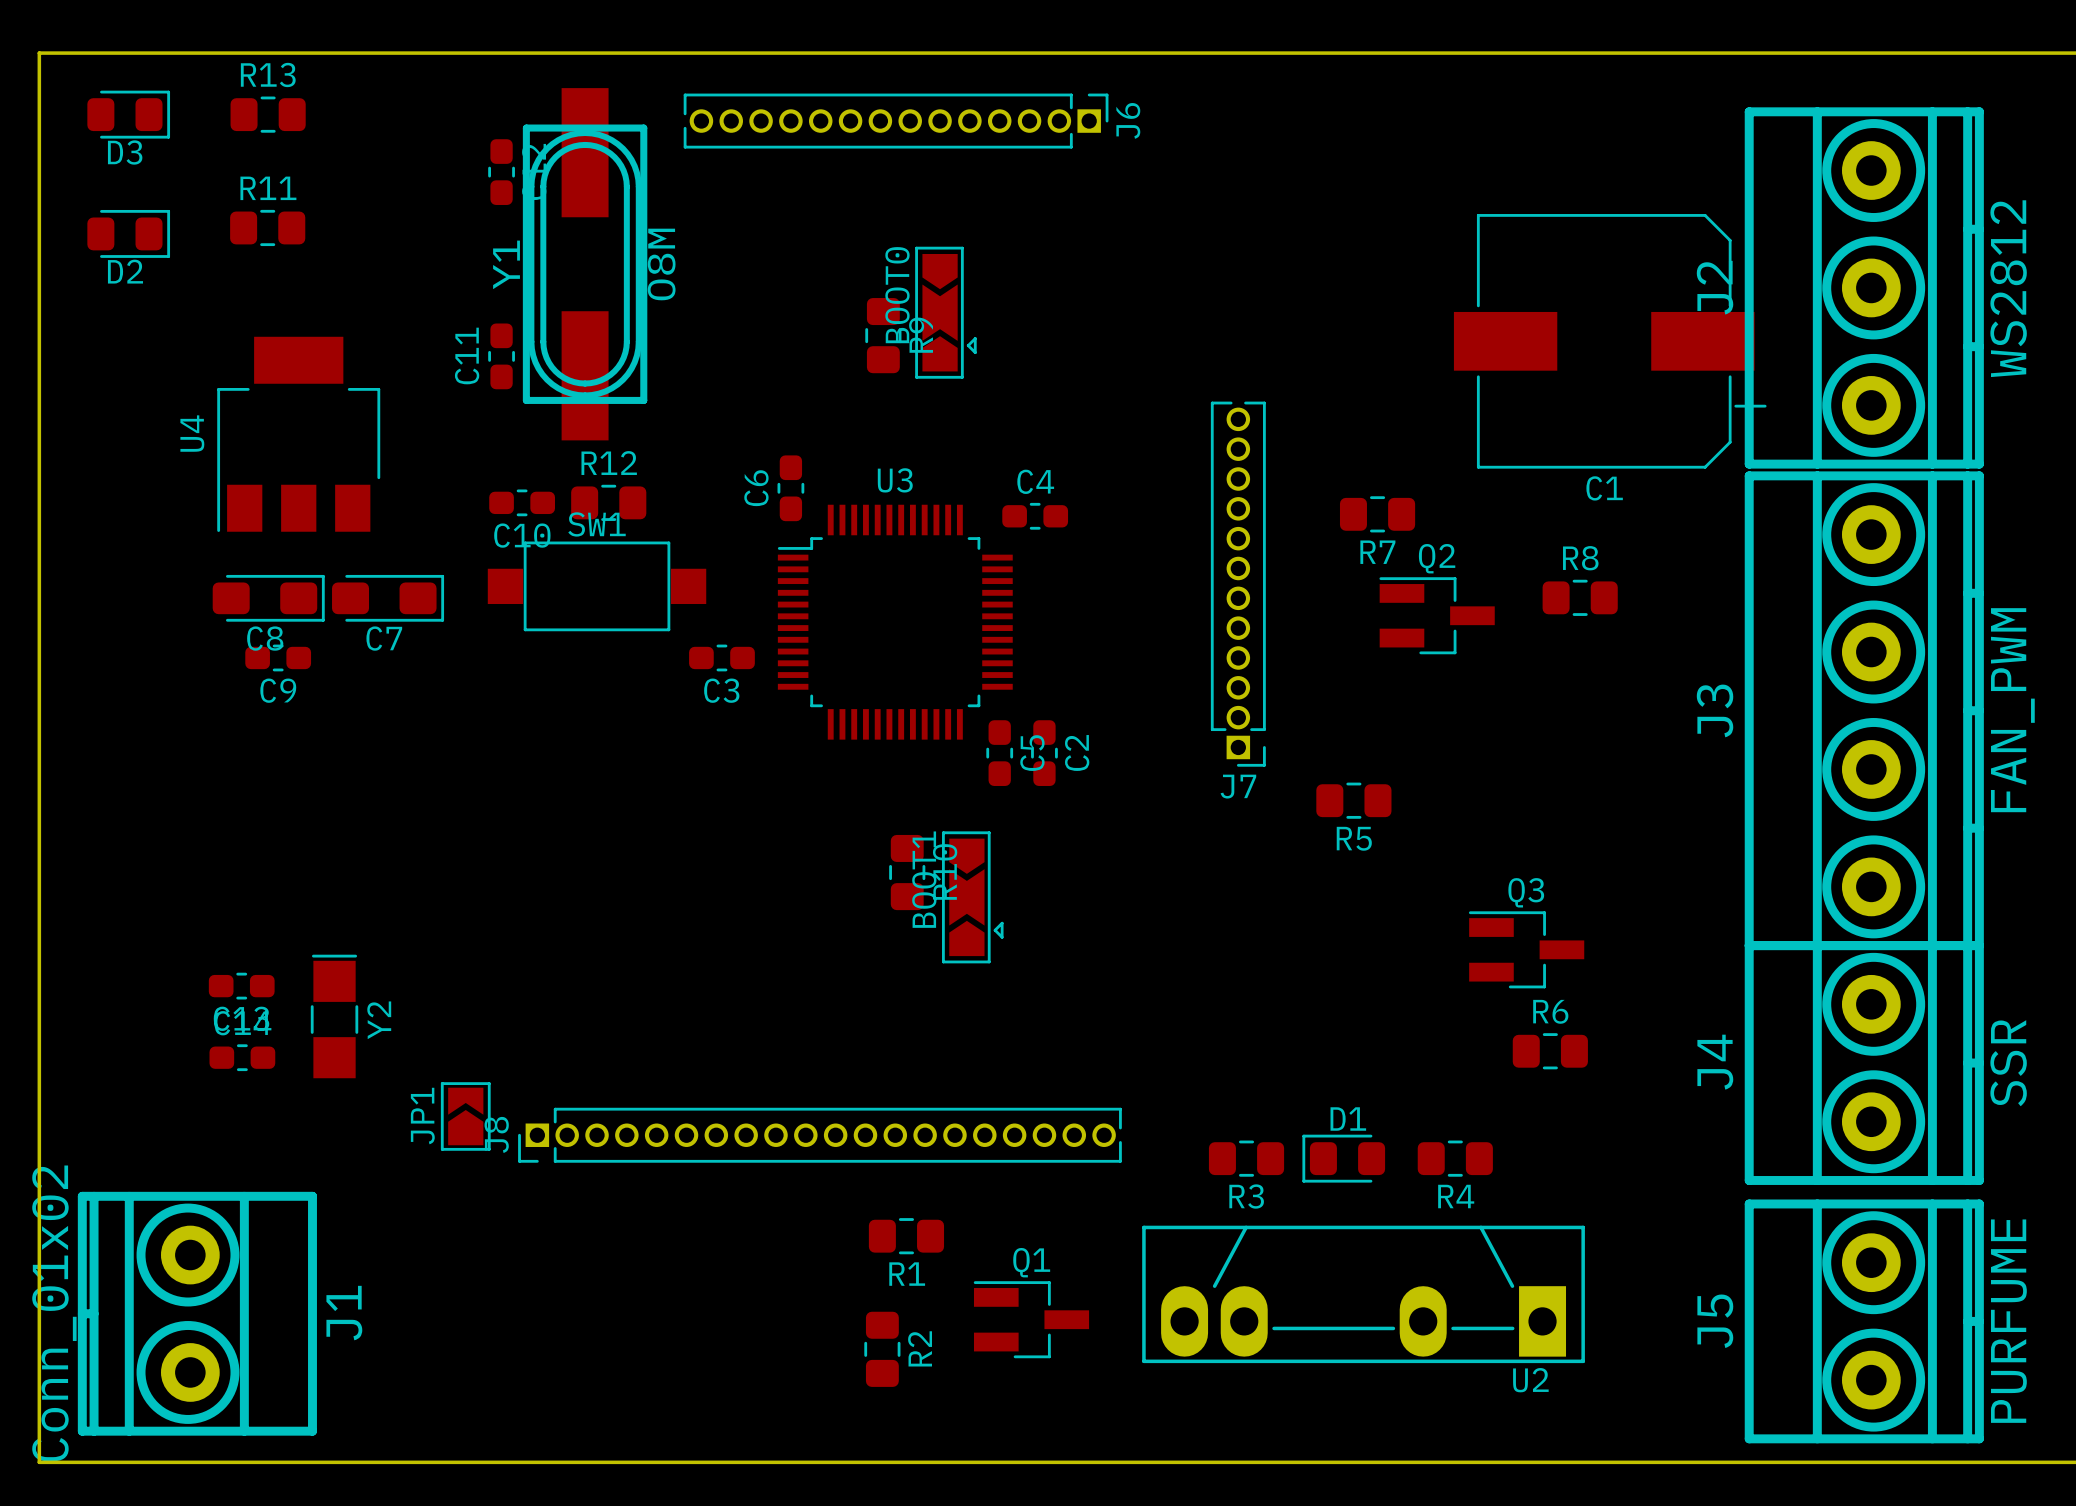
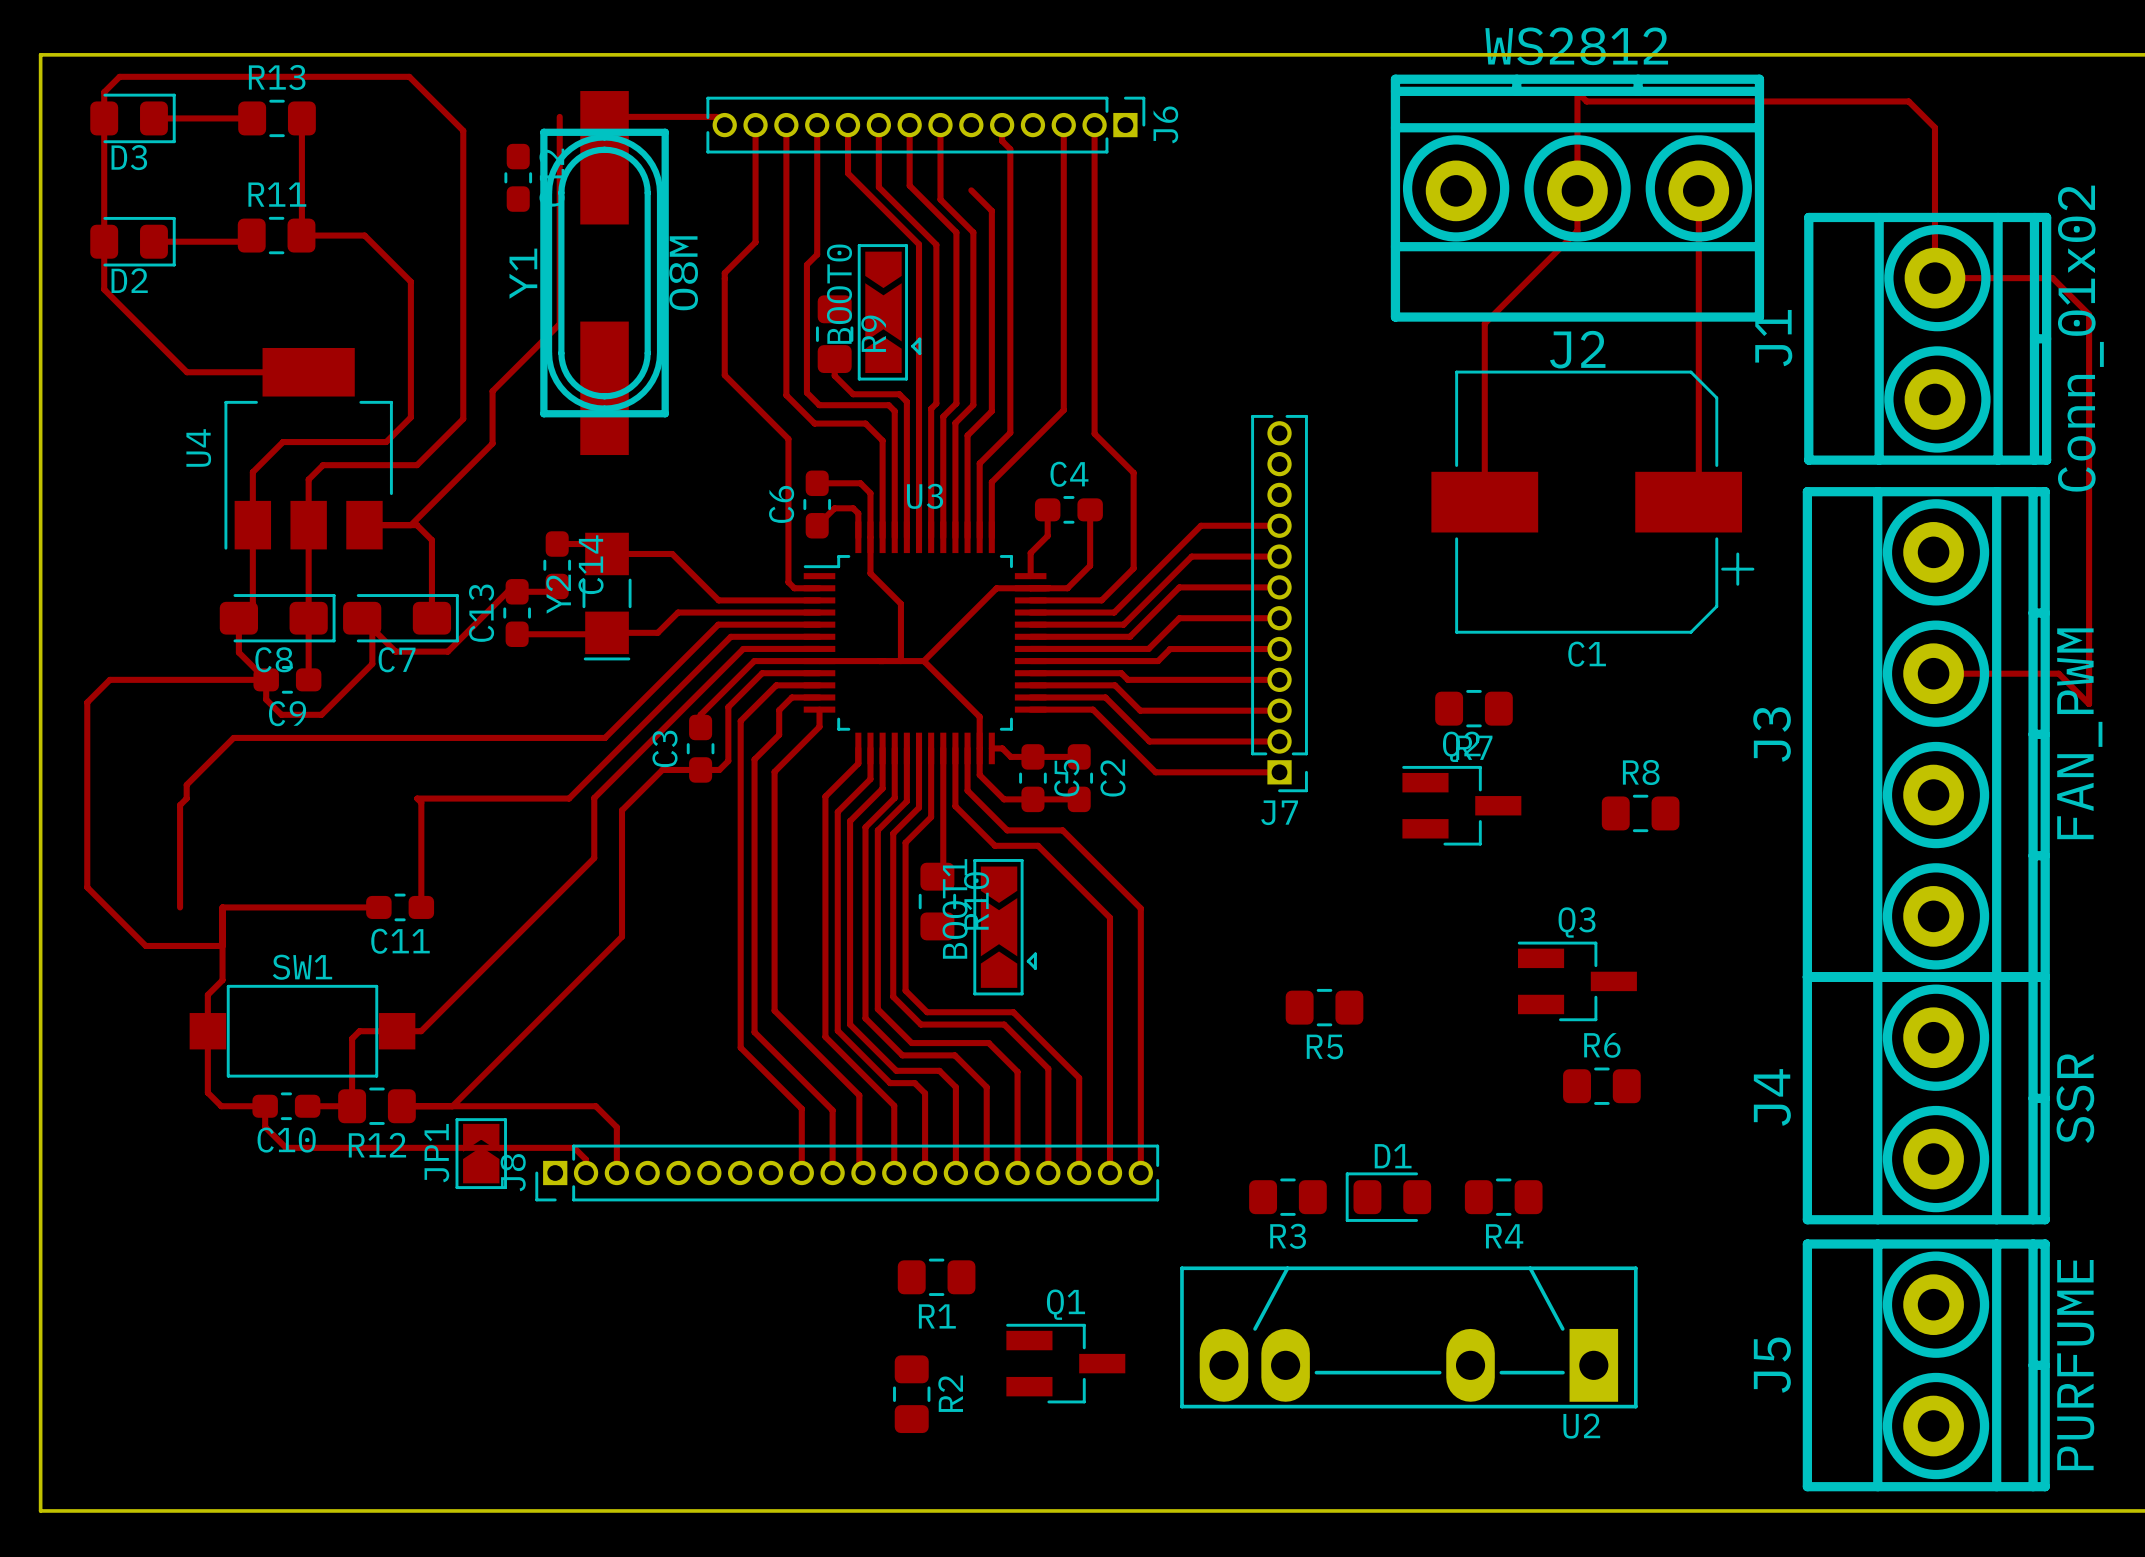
track: none -> (559, 116) (559, 324) (492, 391) (492, 443) (411, 525)
track: none -> (153, 118) (252, 118)
track: none -> (301, 118) (301, 235) (364, 235) (410, 281) (410, 417) (386, 442) (282, 442) (252, 472) (252, 604) (238, 618) (238, 652) (266, 679)
track: none -> (603, 125) (594, 116) (716, 116) (724, 125)
track: none -> (755, 125) (755, 242) (724, 273) (724, 375) (788, 438) (788, 582) (794, 588) (819, 588)
track: none -> (786, 125) (786, 395) (814, 423) (865, 423) (882, 440) (882, 537)
track: none -> (817, 125) (817, 254) (806, 264) (806, 392) (819, 405) (888, 405) (894, 411) (894, 537)
track: none -> (848, 125) (848, 173) (919, 244) (919, 537)
track: none -> (878, 125) (878, 187) (936, 244) (936, 403) (931, 408) (931, 537)
track: none -> (909, 125) (909, 185) (956, 232) (956, 403) (943, 416) (943, 537)
track: none -> (940, 125) (940, 199) (973, 232) (973, 405) (955, 423) (955, 537)
track: none -> (1002, 125) (1002, 141) (1010, 149) (1010, 432) (979, 463) (979, 537)
track: none -> (1063, 125) (1063, 410) (991, 482) (991, 537)
track: none -> (1094, 125) (1094, 433) (1133, 472) (1133, 568) (1101, 600) (1030, 600)
track: none -> (971, 190) (991, 210) (991, 411) (967, 435) (967, 537)
track: none -> (1698, 190) (1698, 491) (1688, 502)
track: none -> (251, 235) (245, 241) (153, 241)
J2 rotation: 0° (1864, 287) -> 90° counterclockwise (1577, 198)
J2 position: (1864, 287) -> (1577, 198)
BOOT0 position: (945, 312) -> (889, 312)
R9 position: (883, 335) -> (834, 334)
C1 position: (1610, 341) -> (1592, 502)
track: none -> (834, 359) (834, 375) (853, 394) (899, 394) (906, 401) (906, 537)
C11 name position: C11 (467, 355) -> C11 (400, 941)
C11 rotation: 0° (501, 356) -> 90° clockwise (400, 907)
C11 position: (501, 356) -> (400, 907)
track: none -> (308, 372) (186, 372) (104, 289) (104, 92) (119, 76) (409, 76) (463, 130) (463, 418) (417, 465) (323, 465) (308, 479) (308, 679)
R12 name position: R12 (609, 463) -> R12 (377, 1145)
track: none -> (817, 483) (860, 483) (870, 493) (870, 573) (900, 603) (900, 661)
track: none -> (1484, 502) (1484, 323) (1577, 230) (1577, 92) (1586, 101) (1908, 101) (1934, 127) (1934, 278) (2052, 278) (2089, 314) (2089, 704) (2058, 673) (1933, 673)
track: none -> (1047, 509) (1047, 535) (1030, 553) (1030, 576)
track: none -> (1090, 509) (1090, 565) (1067, 588) (996, 588) (923, 661)
C10 position: (522, 502) -> (286, 1106)
R12 position: (608, 502) -> (376, 1106)
track: none -> (364, 525) (416, 525) (431, 540) (431, 618)
track: none -> (817, 525) (834, 508) (853, 508) (858, 513) (858, 537)
track: none -> (1279, 525) (1200, 525) (1114, 612) (1030, 612)
R7 position: (1377, 514) -> (1473, 708)
C4 position: (1035, 516) -> (1068, 509)
track: none -> (557, 544) (597, 544) (607, 553) (672, 553) (718, 600) (819, 600)
track: none -> (1279, 556) (1191, 556) (1123, 624) (1030, 624)
track: none -> (557, 586) (551, 591) (507, 591) (447, 651) (395, 651) (362, 618)
track: none -> (1279, 587) (1179, 587) (1129, 636) (1030, 636)
SW1 position: (597, 586) -> (302, 1031)
track: none -> (819, 612) (678, 612) (657, 632) (517, 634)
R8 position: (1580, 597) -> (1640, 813)
track: none -> (1279, 618) (1179, 618) (1148, 648) (1030, 648)
track: none -> (819, 624) (718, 624) (605, 737) (233, 737) (186, 784) (186, 798) (180, 805) (180, 907)
track: none -> (372, 628) (372, 663) (321, 714) (281, 714) (266, 699) (266, 679)
Q2 position: (1437, 615) -> (1461, 805)
track: none -> (819, 636) (730, 636) (569, 798) (417, 798) (421, 802) (421, 907)
track: none -> (819, 648) (743, 648) (594, 798) (594, 858) (421, 1031) (359, 1031) (352, 1038) (352, 1106) (307, 1106)
track: none -> (1279, 649) (1170, 649) (1158, 661) (1030, 661)
track: none -> (923, 661) (754, 661) (700, 714) (700, 727)
track: none -> (923, 661) (979, 716) (979, 775) (1004, 799) (1079, 799)
track: none -> (819, 673) (762, 673) (728, 707) (728, 761) (719, 769) (662, 769) (622, 810) (622, 936) (452, 1106)
track: none -> (1030, 673) (1121, 673) (1127, 679) (1279, 679)
track: none -> (266, 679) (109, 679) (87, 702) (87, 887) (145, 945) (222, 945)
C3 rotation: 0° (721, 657) -> 90° clockwise (700, 748)
C3 position: (721, 657) -> (700, 748)
track: none -> (819, 685) (776, 685) (740, 720) (740, 1047) (801, 1108) (801, 1172)
track: none -> (1030, 685) (1114, 685) (1140, 710) (1279, 710)
track: none -> (819, 697) (791, 697) (779, 710) (779, 734) (754, 759) (754, 1032) (832, 1110) (832, 1172)
track: none -> (1030, 697) (1105, 697) (1149, 741) (1279, 741)
track: none -> (819, 709) (819, 726) (774, 771) (774, 1010) (859, 1095) (859, 1168) (863, 1172)
track: none -> (1030, 709) (1092, 709) (1155, 772) (1279, 772)
track: none -> (858, 748) (858, 763) (825, 796) (825, 1036) (894, 1105) (894, 1172)
track: none -> (870, 748) (870, 779) (837, 811) (837, 1030) (890, 1083) (914, 1083) (925, 1093) (925, 1172)
track: none -> (882, 748) (882, 788) (850, 821) (850, 1024) (896, 1070) (939, 1070) (955, 1087) (955, 1172)
track: none -> (894, 748) (894, 798) (865, 827) (865, 1018) (902, 1055) (954, 1055) (986, 1087) (986, 1172)
track: none -> (906, 748) (906, 801) (877, 830) (877, 1009) (911, 1043) (988, 1043) (1017, 1071) (1017, 1172)
track: none -> (919, 748) (919, 807) (893, 833) (893, 996) (920, 1024) (1004, 1024) (1048, 1068) (1048, 1172)
track: none -> (931, 748) (931, 817) (905, 842) (905, 990) (927, 1012) (1013, 1012) (1079, 1077) (1079, 1172)
track: none -> (943, 748) (943, 870) (937, 876)
track: none -> (955, 748) (955, 806) (994, 845) (1038, 845) (1110, 917) (1110, 1172)
track: none -> (967, 748) (967, 790) (1007, 830) (1062, 830) (1140, 908) (1140, 1172)
track: none -> (991, 748) (1002, 748) (1010, 756) (1079, 756)
R5 position: (1353, 800) -> (1324, 1007)
track: none -> (378, 907) (222, 907) (222, 980) (207, 994) (207, 1092) (221, 1106) (265, 1106) (265, 1126) (286, 1147) (574, 1147) (586, 1159) (586, 1172)
C13 rotation: 0° (241, 986) -> 90° clockwise (517, 613)
C13 position: (241, 986) -> (517, 613)
Y2 rotation: 0° (334, 1016) -> 180° (607, 596)
Y2 position: (334, 1016) -> (607, 596)
C14 rotation: 0° (242, 1057) -> 90° clockwise (557, 565)
C14 position: (242, 1057) -> (557, 565)
track: none -> (401, 1106) (595, 1106) (616, 1127) (616, 1172)
J1 rotation: 0° (197, 1313) -> 180° (1927, 338)
J1 position: (197, 1313) -> (1927, 338)

